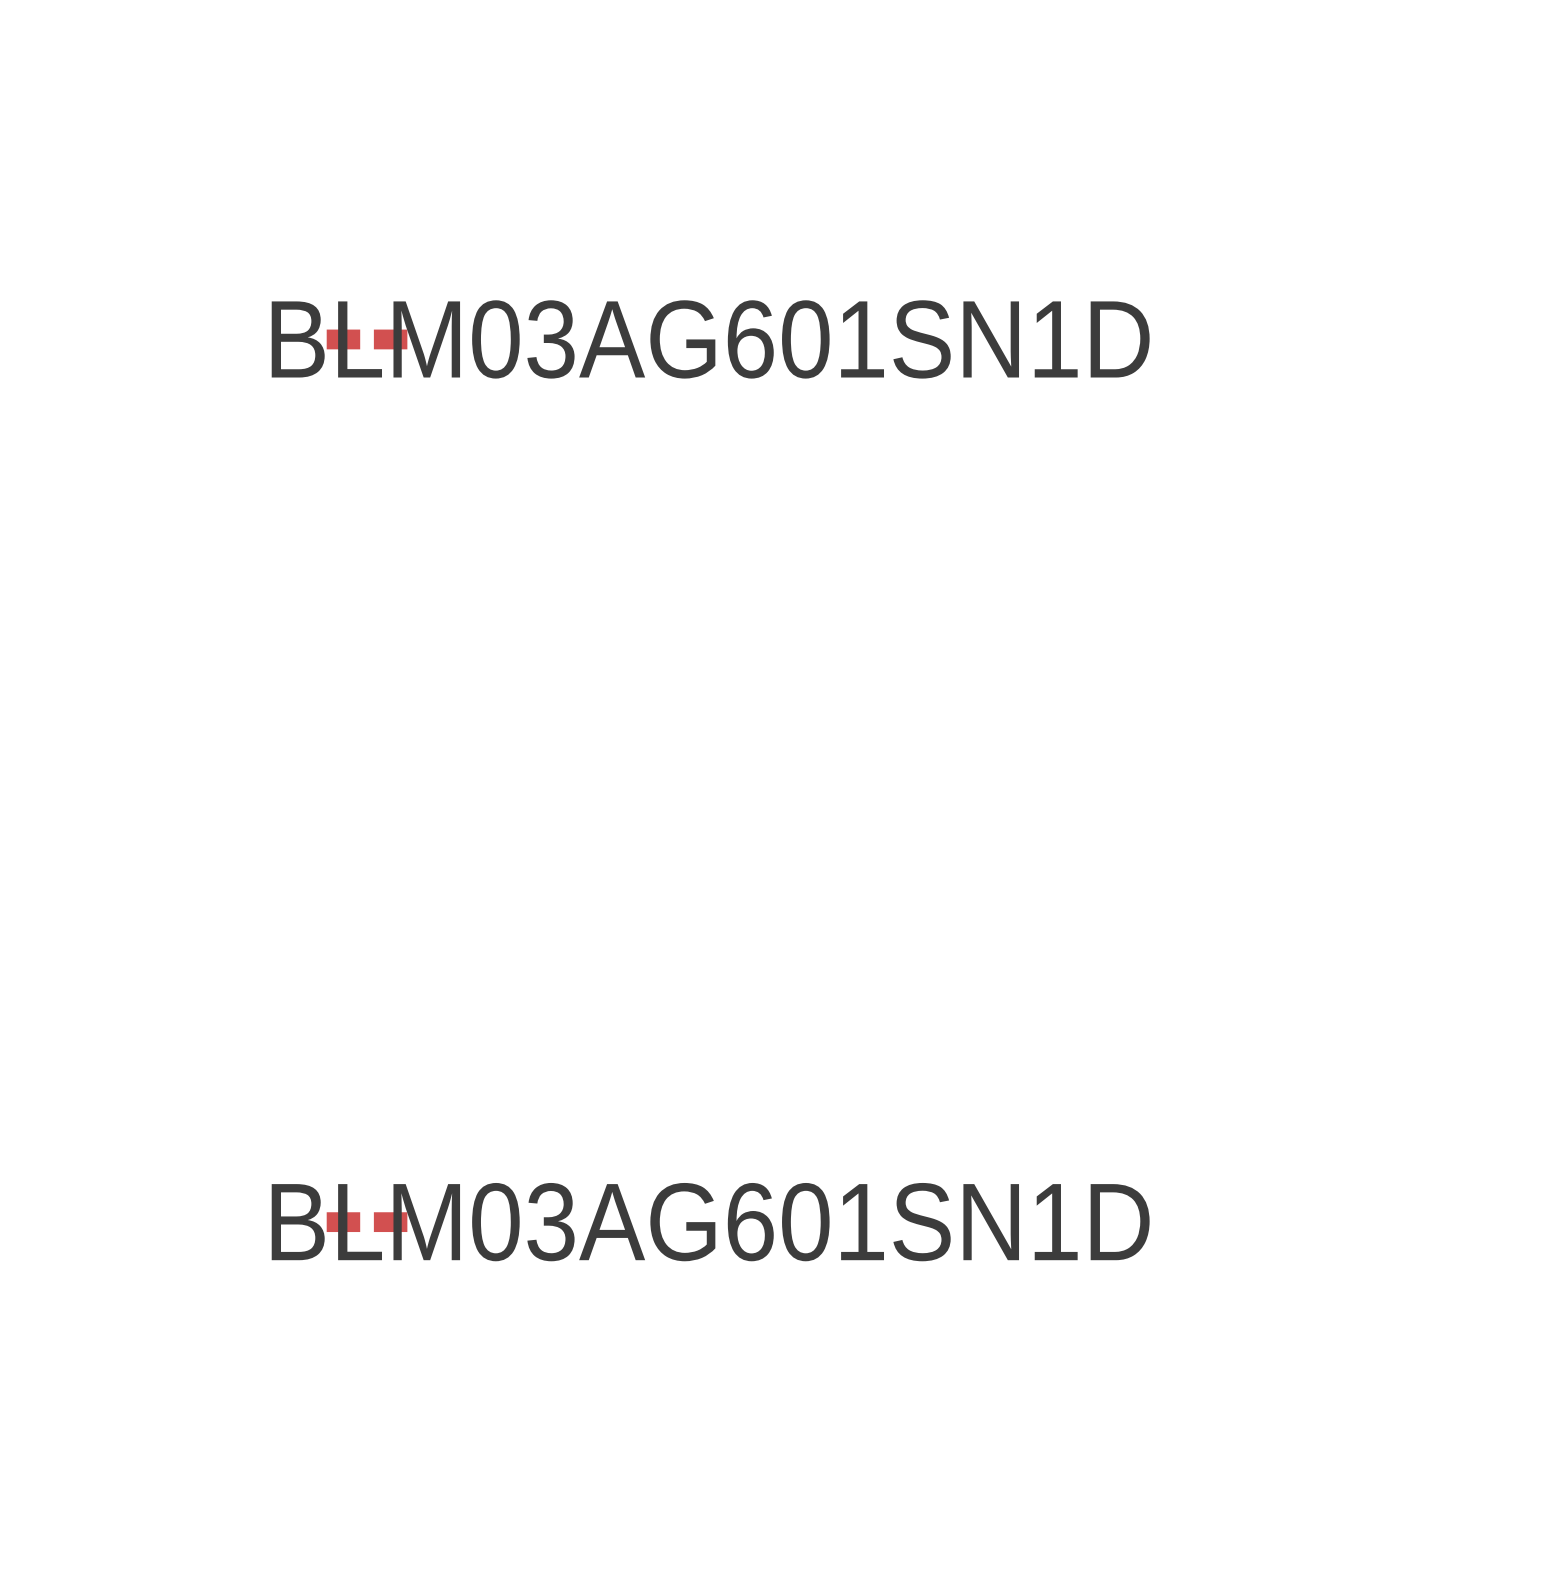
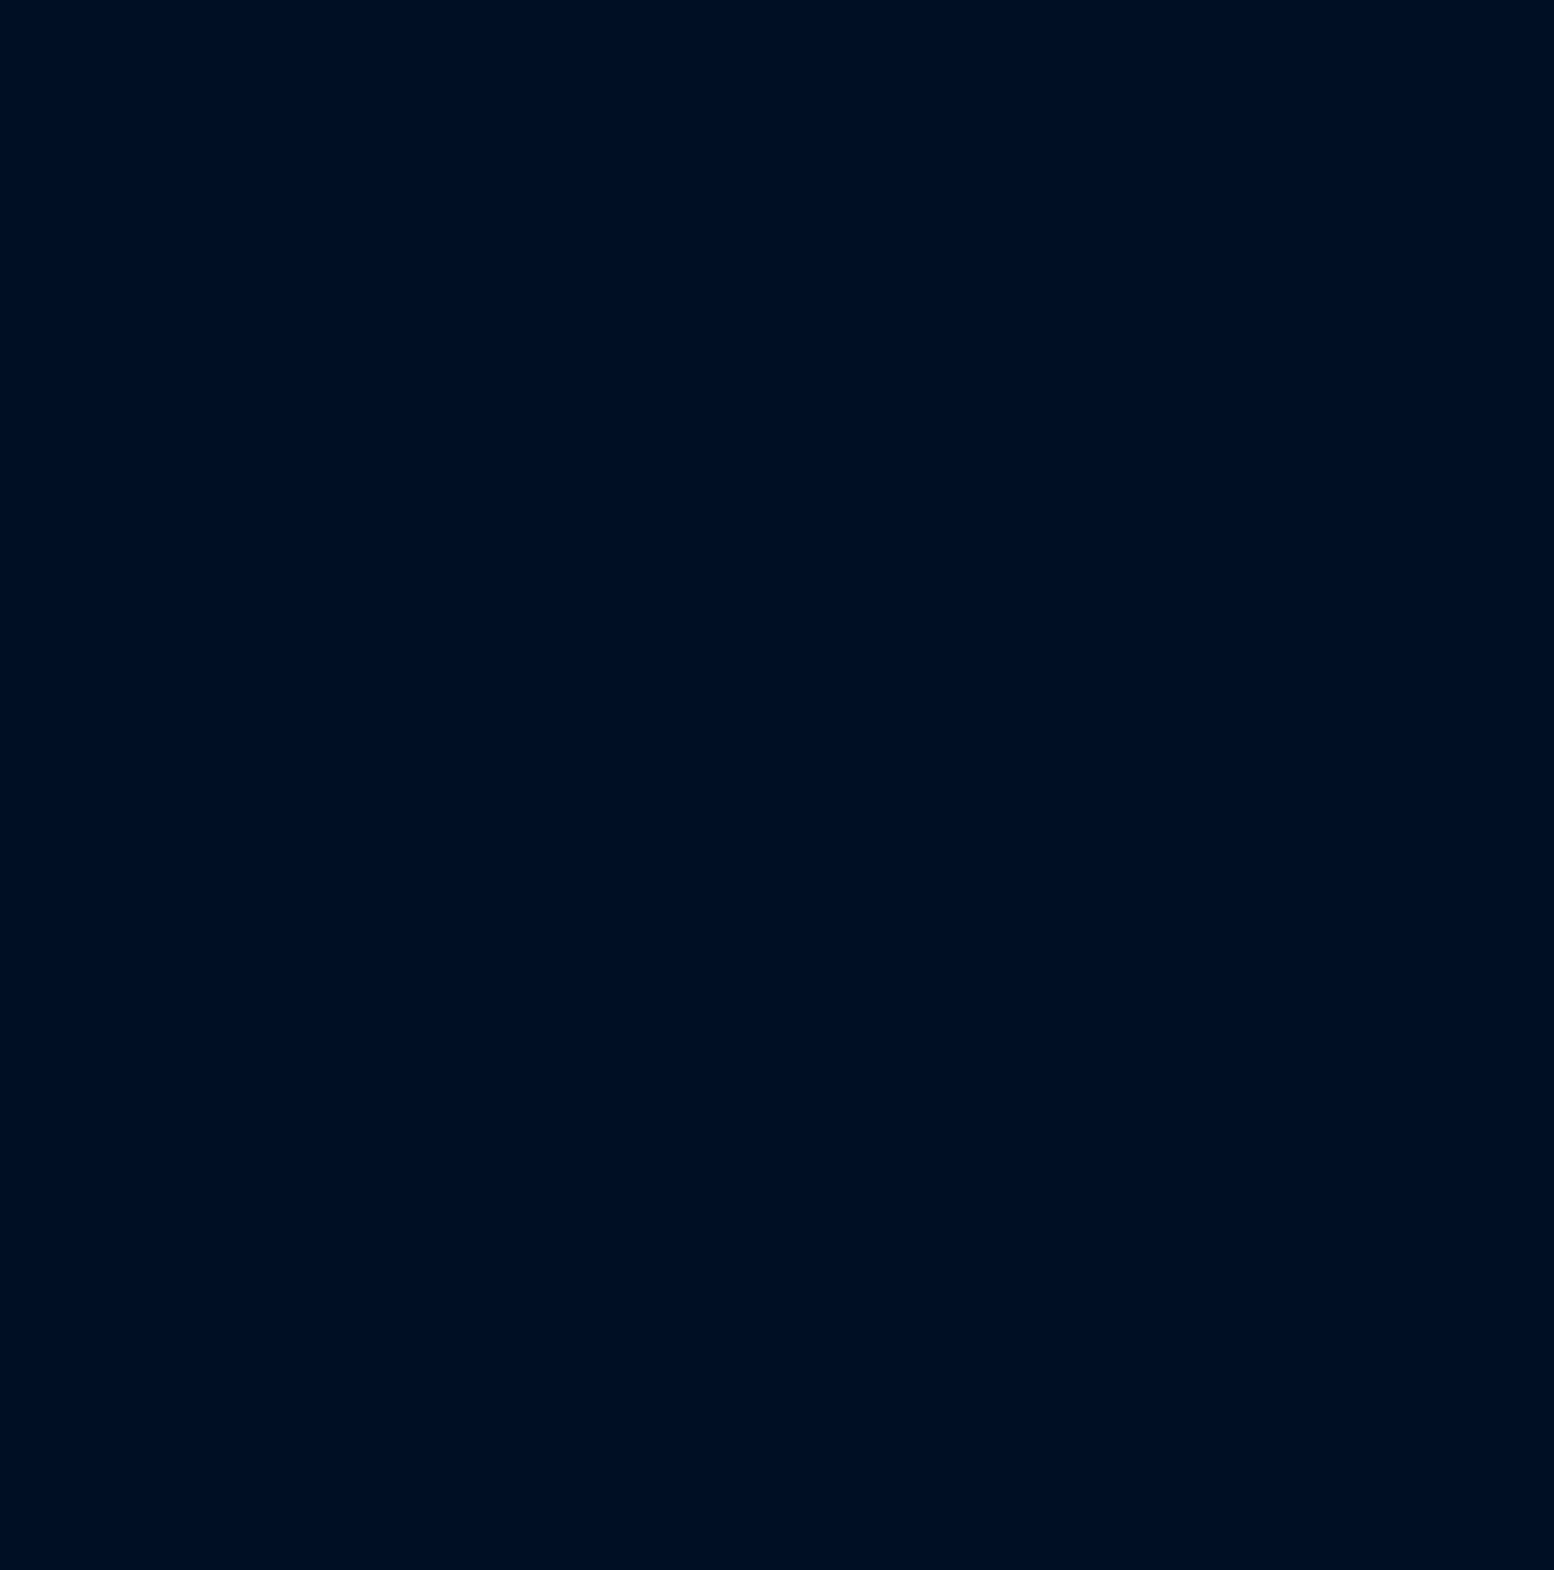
part: BLM03AG601SN1D (367, 339) -> none
part: BLM03AG601SN1D (367, 1222) -> none

